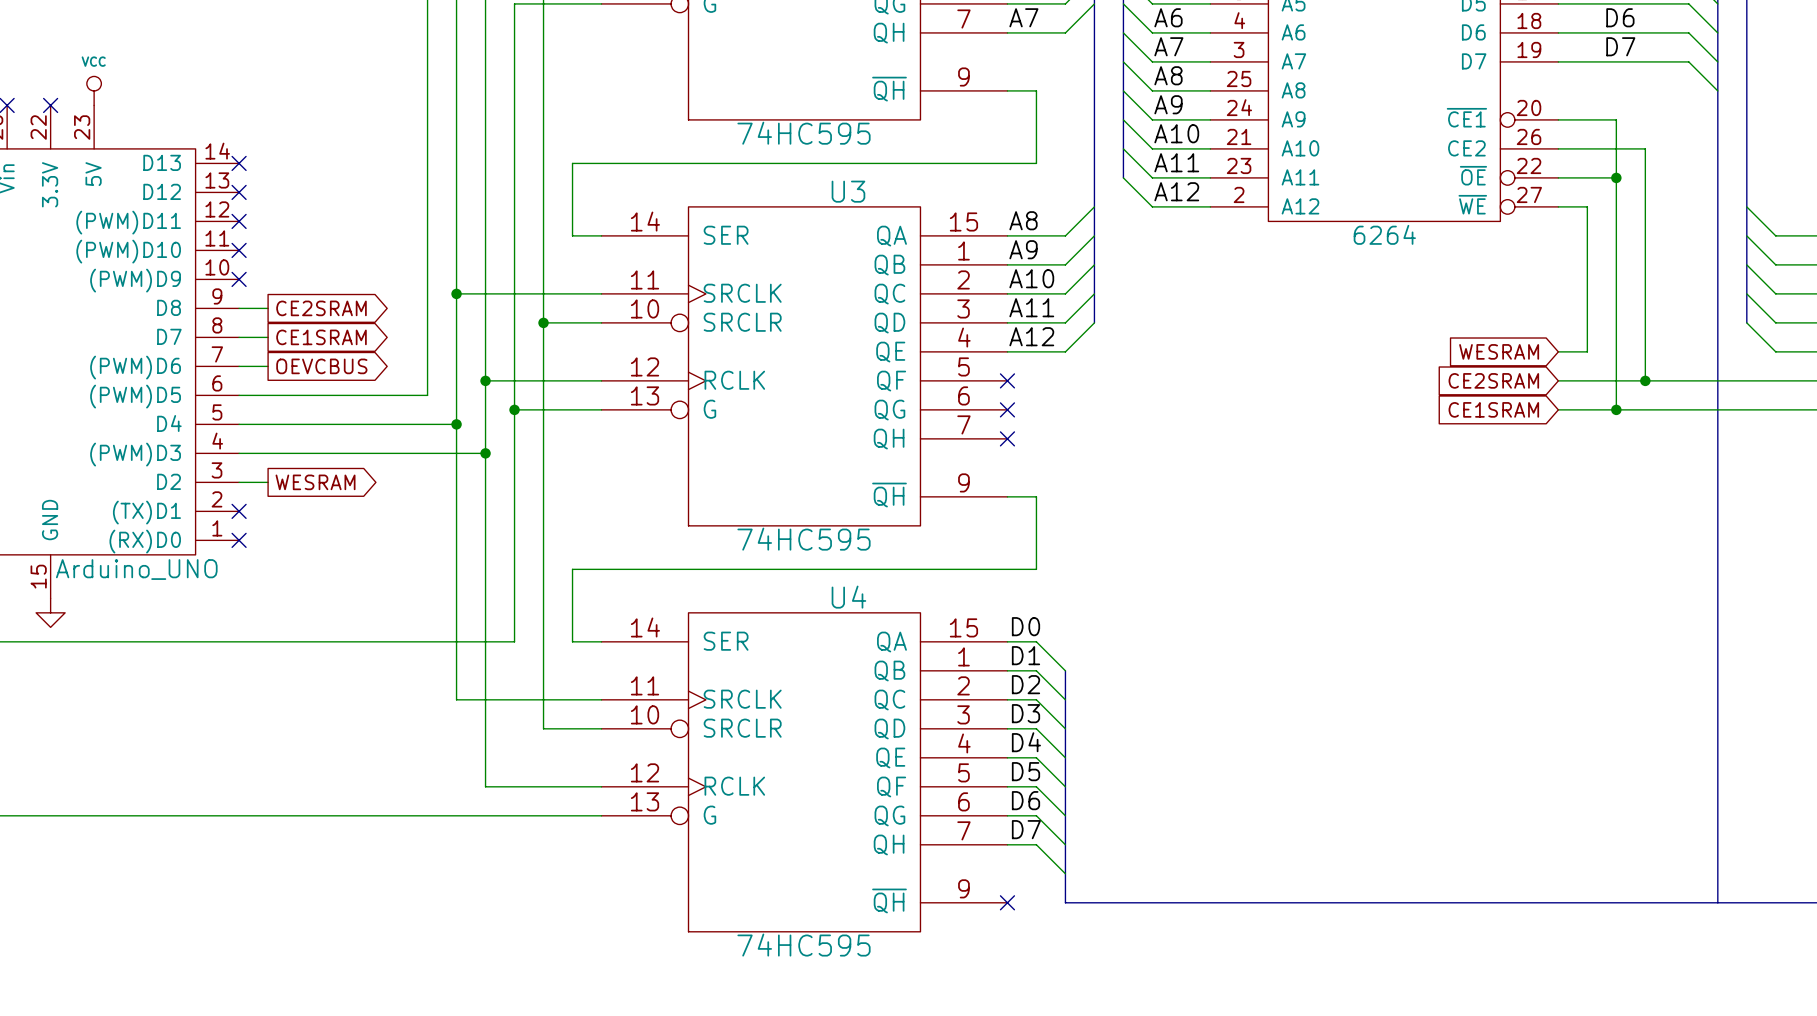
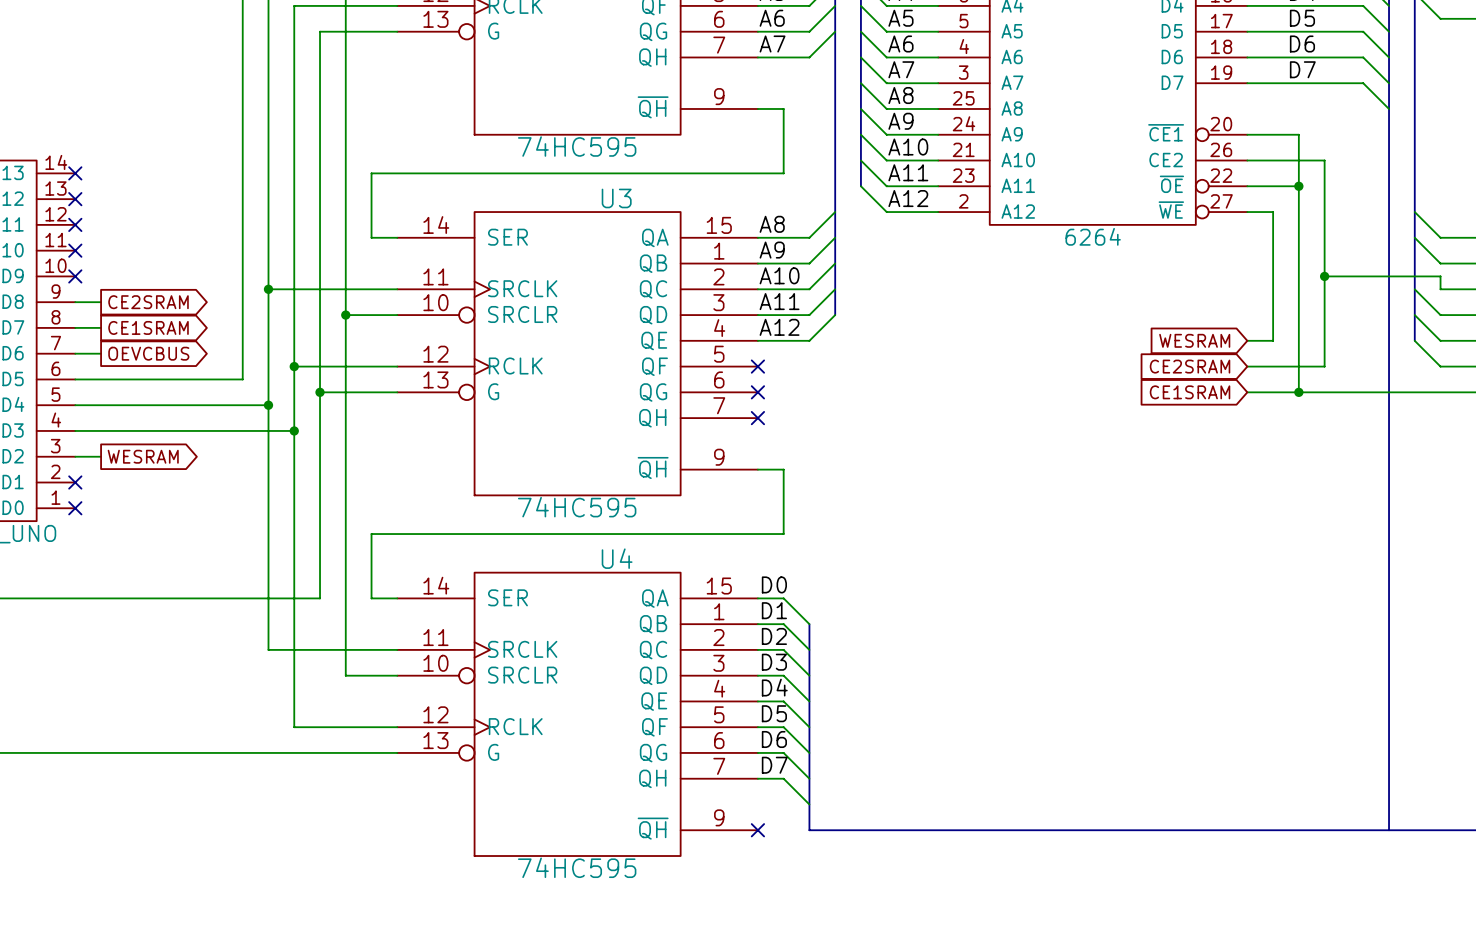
wire: (1746, 264) (1775, 293) -> (1324, 276) (1440, 276) (1440, 289)
junction: none -> (1324, 276)
bus: none -> (1414, 315) (1414, 340)
wire: (1645, 380) (1775, 380) -> (1414, 340) (1440, 366)
junction: (1645, 380) -> none

